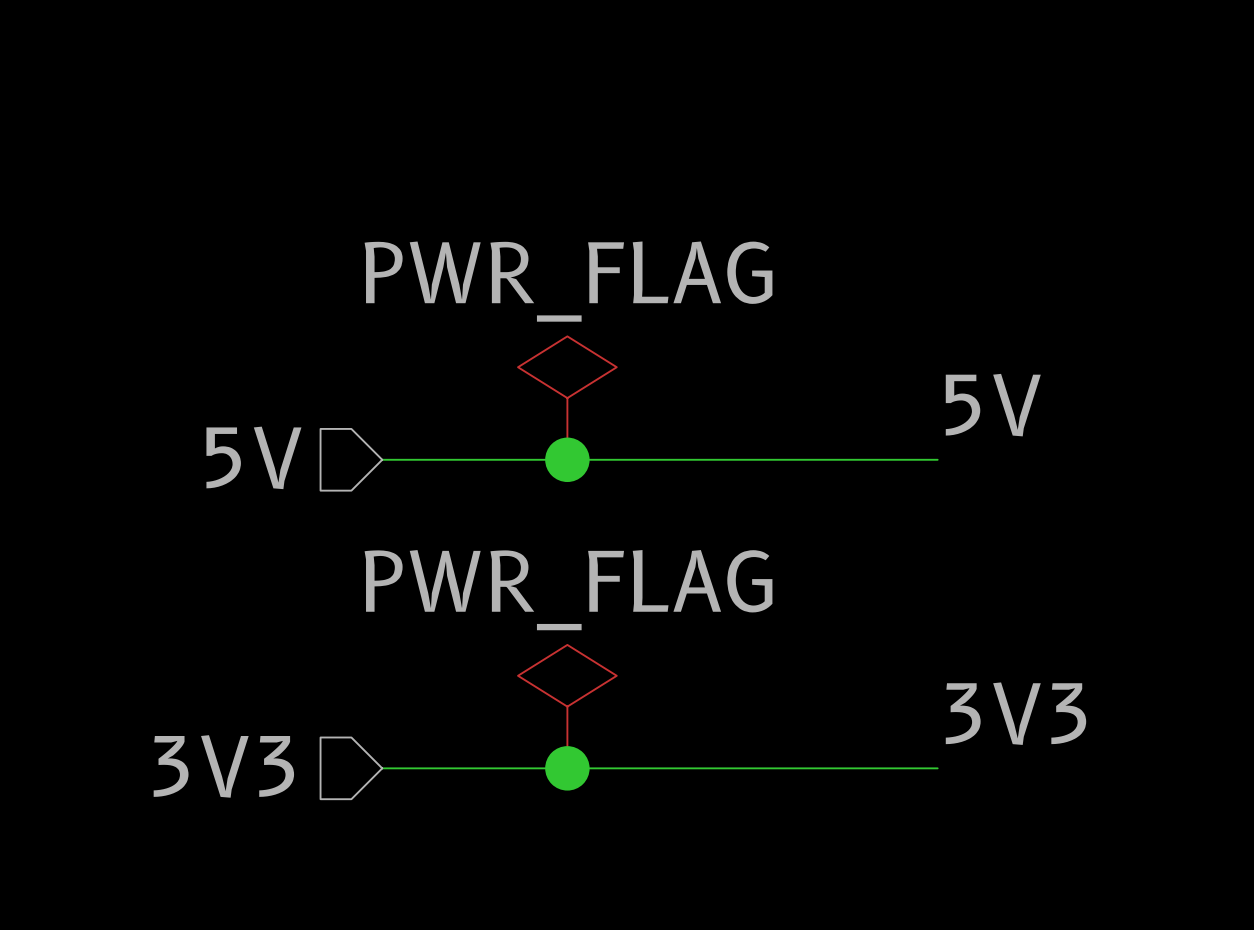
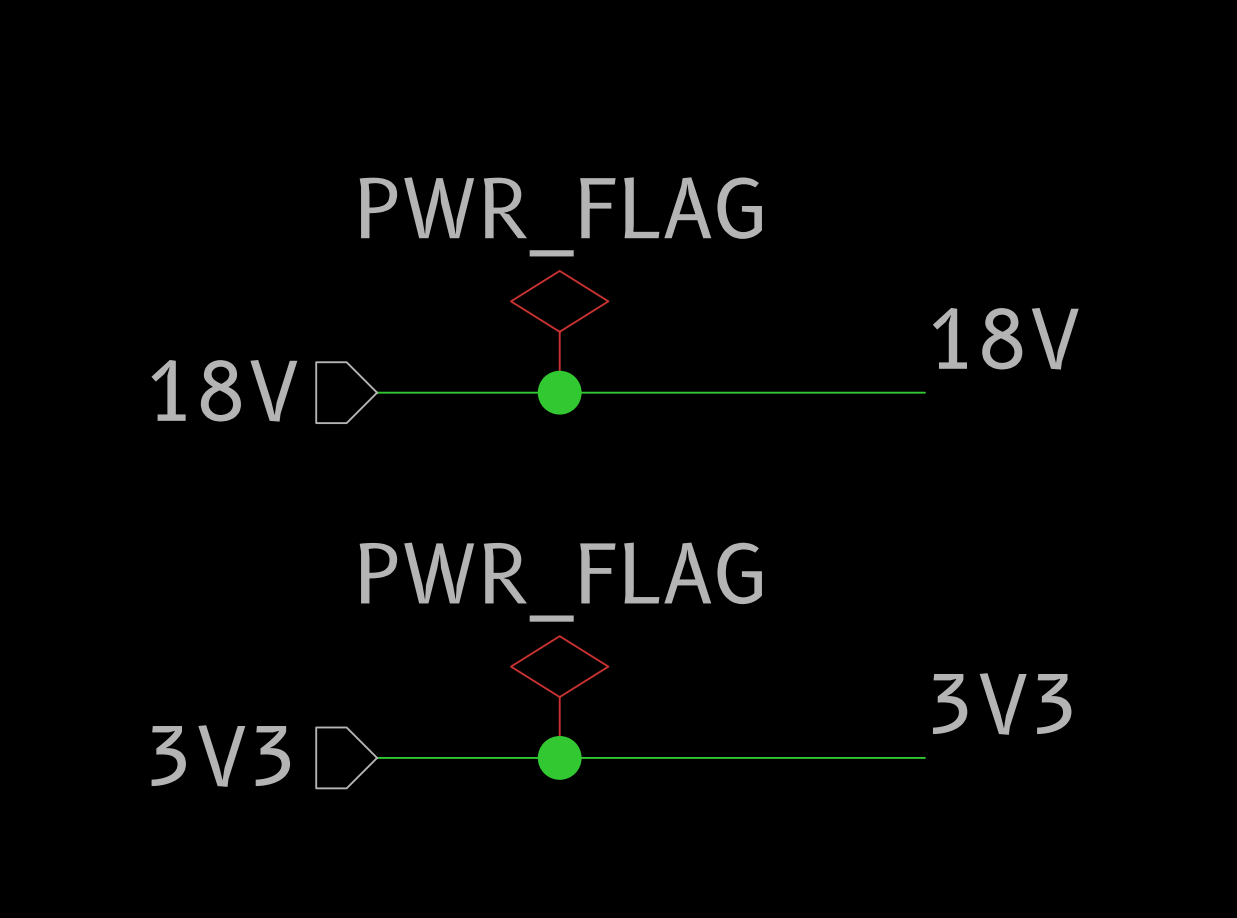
label: none -> 18V (1005, 338)
hierarchical label: none -> 18V (224, 390)
power symbol position: PWR_FLAG (567, 398) -> PWR_FLAG (559, 331)
label: 5V (993, 405) -> none
hierarchical label: 5V (253, 457) -> none
wire: (382, 459) (937, 459) -> (377, 392) (924, 392)
junction position: (567, 459) -> (559, 392)

